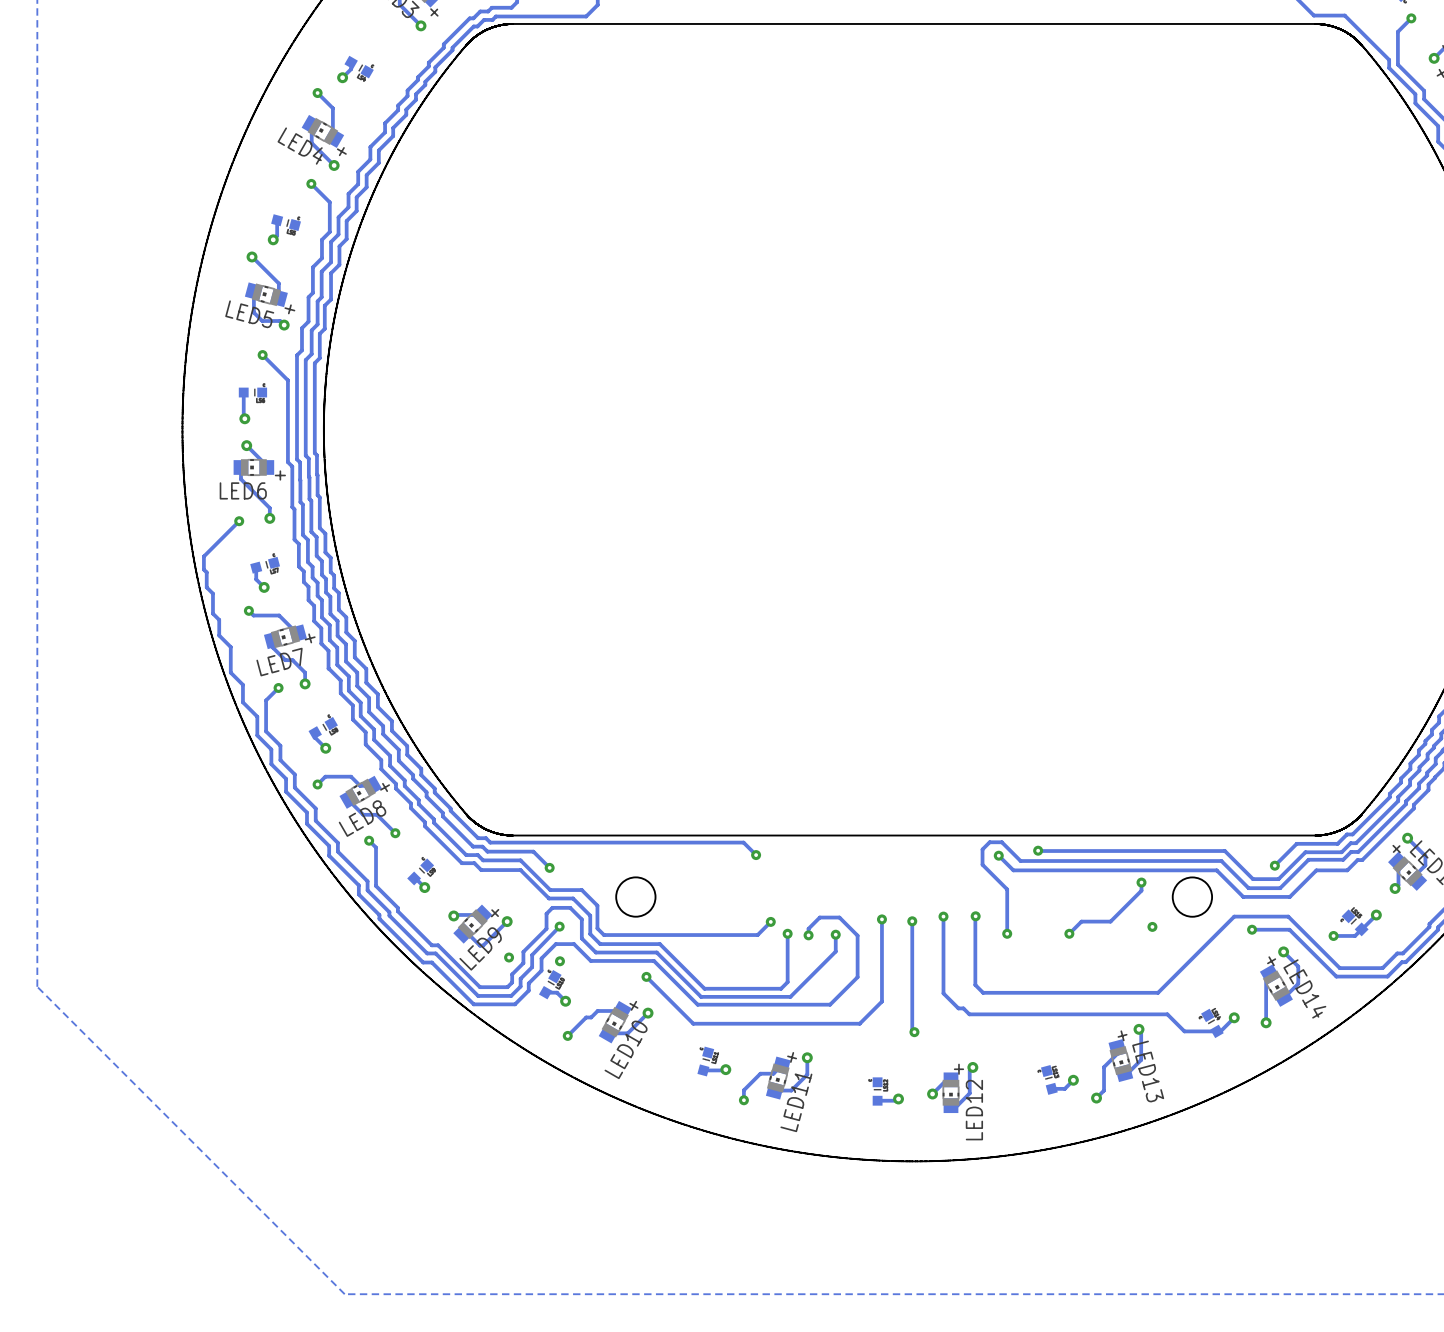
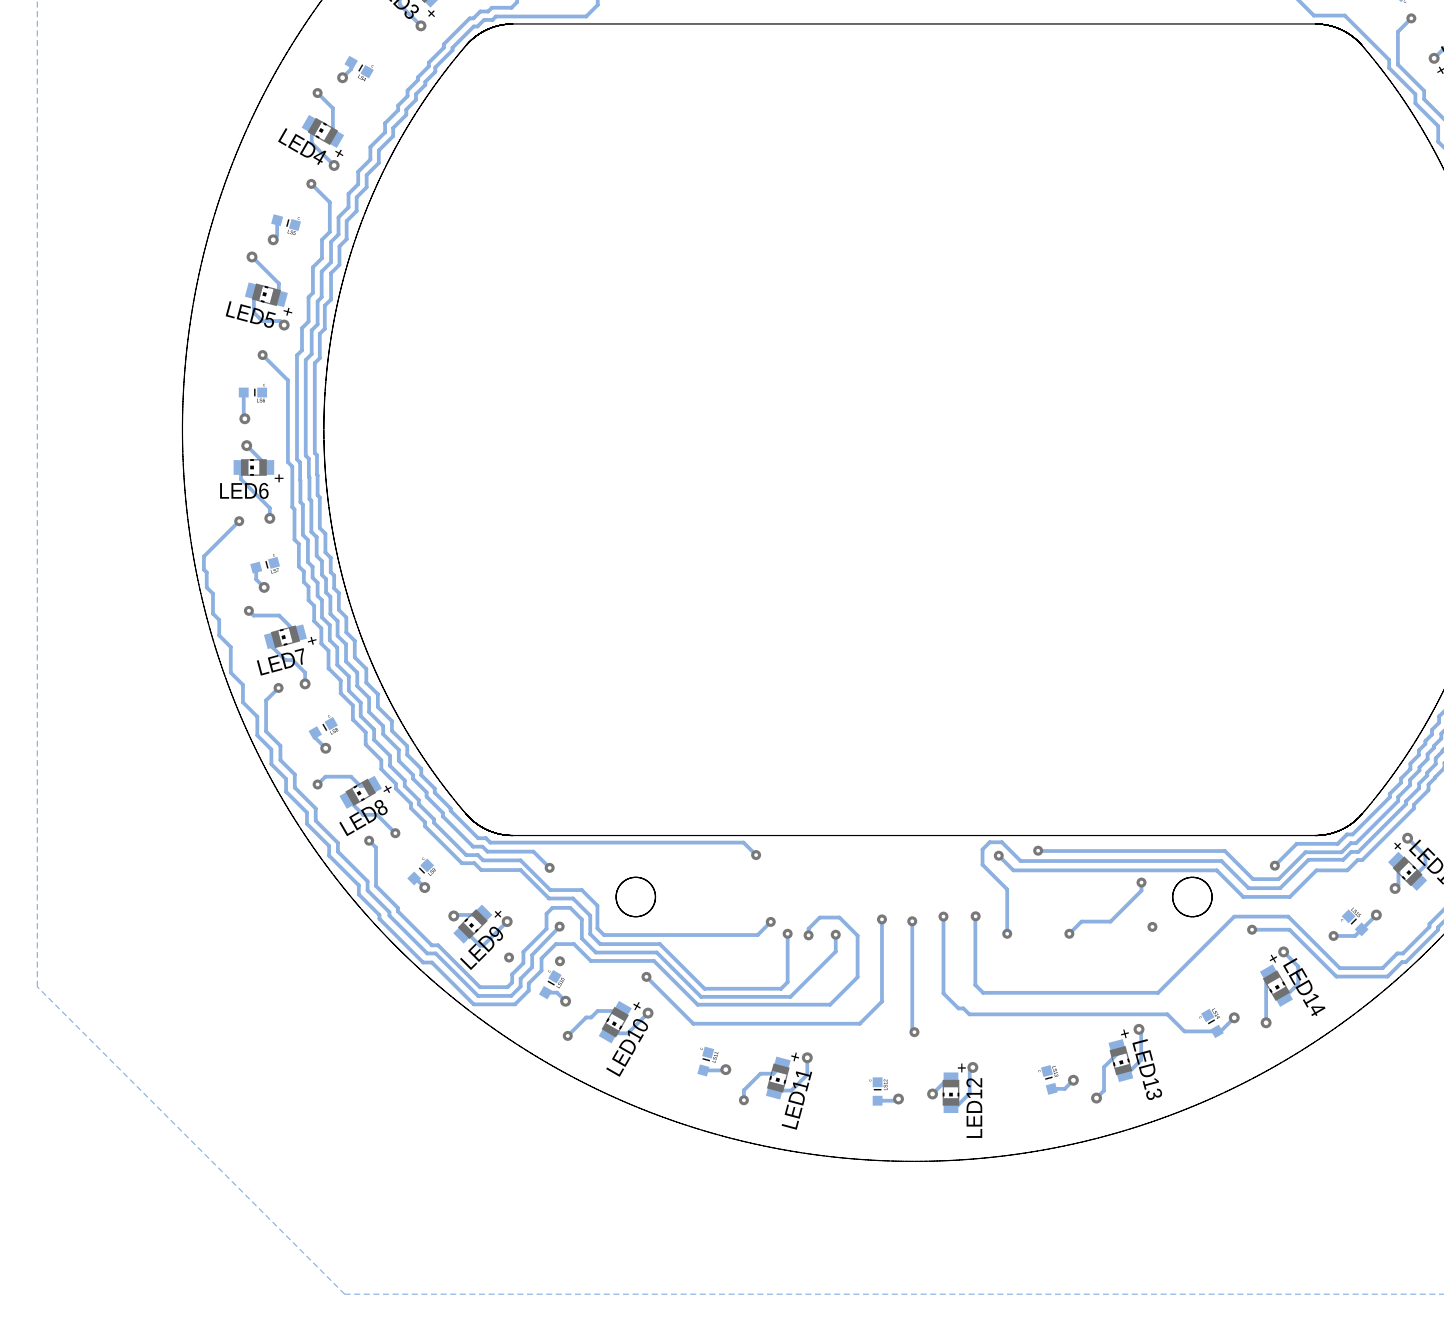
board edge: none -> (637, 877) (650, 884) (654, 890) (655, 898) (648, 911) (642, 915) (634, 916) (620, 910) (617, 903) (616, 895) (622, 882) (629, 878) (637, 877)
board edge: none -> (1193, 877) (1207, 884) (1210, 890) (1212, 898) (1205, 911) (1198, 915) (1191, 916) (1177, 910) (1173, 903) (1172, 895) (1179, 882) (1185, 878) (1193, 877)

